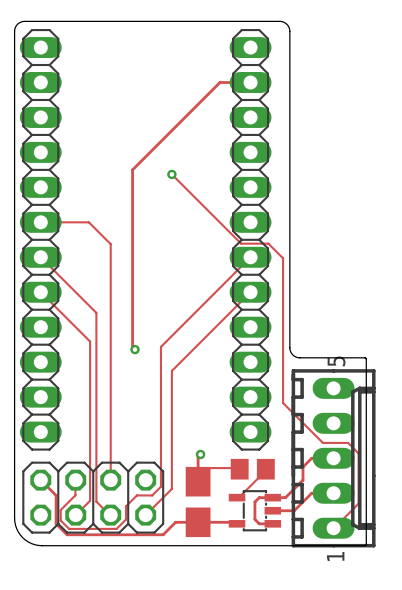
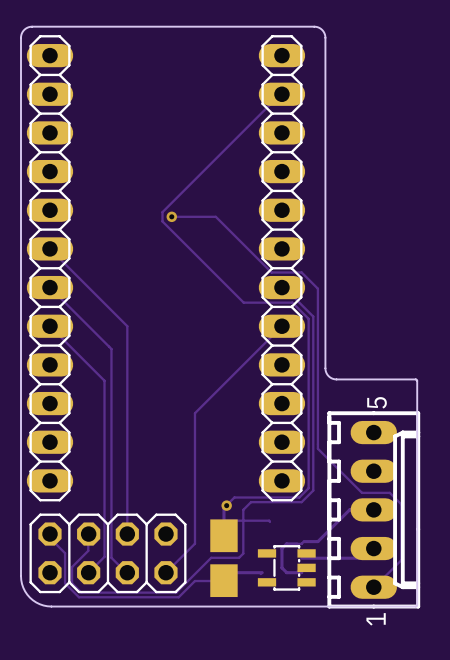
track: (250, 82) (219, 82) (132, 169) (132, 347) (135, 349) -> (281, 94) (162, 212) (162, 221) (243, 302) (292, 302) (308, 318) (308, 488) (299, 497) (234, 497) (226, 505)
track: (171, 174) (190, 193) -> (171, 216) (215, 216)
via position: (171, 174) -> (171, 216)
track: (40, 222) (88, 222) (110, 244) (110, 292) -> (49, 248) (127, 326)
track: (250, 257) (160, 346) (160, 486) (152, 495) (136, 495) (126, 506) (126, 519) (116, 528) (69, 528) (60, 520) -> (281, 287) (284, 287) (313, 316) (313, 490) (301, 502) (251, 502) (243, 509) (243, 553) (239, 557) (211, 557) (176, 592) (81, 592) (72, 583) (72, 578)
board edge: (289, 330) (290, 350) (296, 357) (366, 358) (364, 545) -> (325, 368) (328, 376) (335, 379) (417, 380) (417, 605) (408, 606)
via: (135, 349) -> none
track: (302, 467) (302, 480) (285, 497) (259, 497) (254, 501) (254, 519) (259, 523) (272, 523) -> (339, 519) (317, 541) (304, 541) (301, 543)
part: (252, 469) -> none
track: (265, 469) (237, 497) -> none
track: (40, 480) (56, 495) (56, 523) (67, 534) (163, 534) (175, 522) (235, 522) -> none
track: none -> (49, 538) (65, 553) (65, 583) (78, 597) (178, 597) (194, 581) (222, 581) (231, 572) (262, 572) (260, 574)
track: none -> (301, 543) (286, 543) (281, 548) (281, 567) (286, 572) (301, 572) (297, 571)
track: (333, 493) (311, 493) (294, 510) (272, 510) -> none
track: none -> (378, 548) (368, 558) (301, 558)

